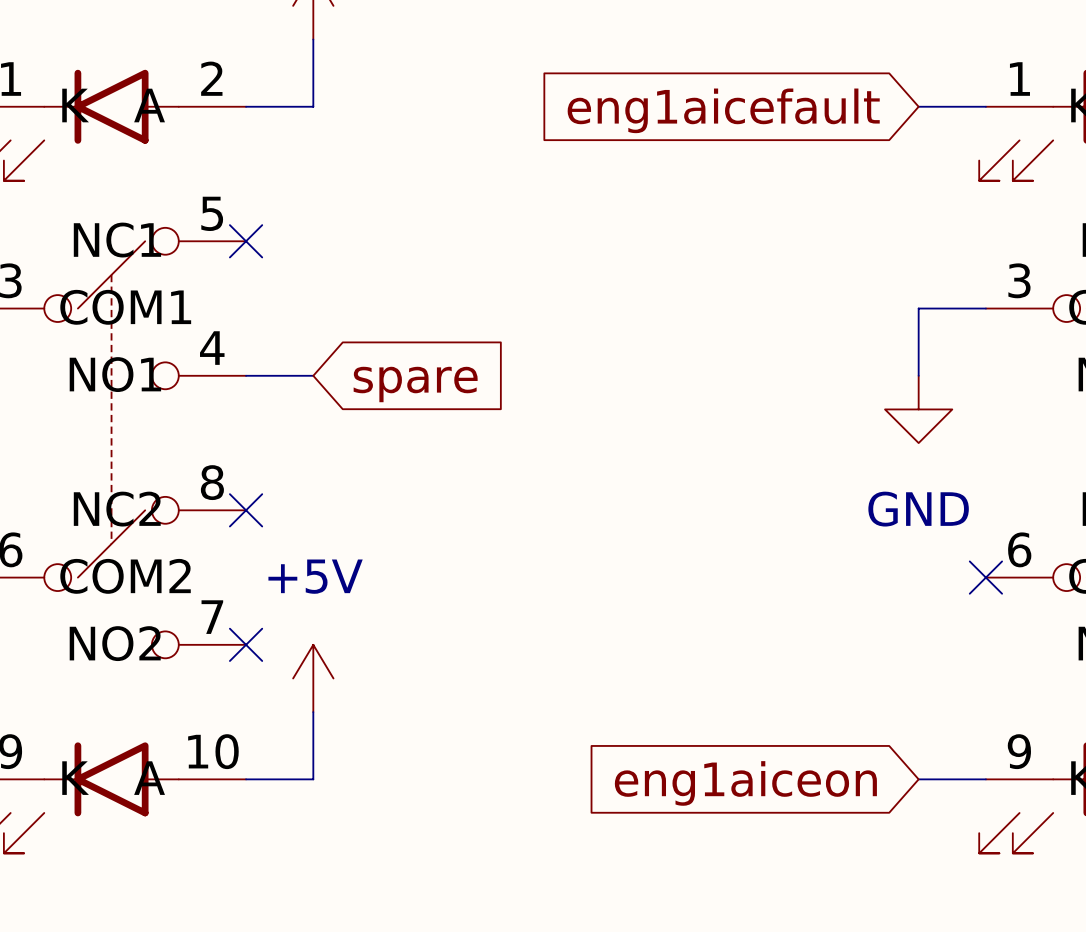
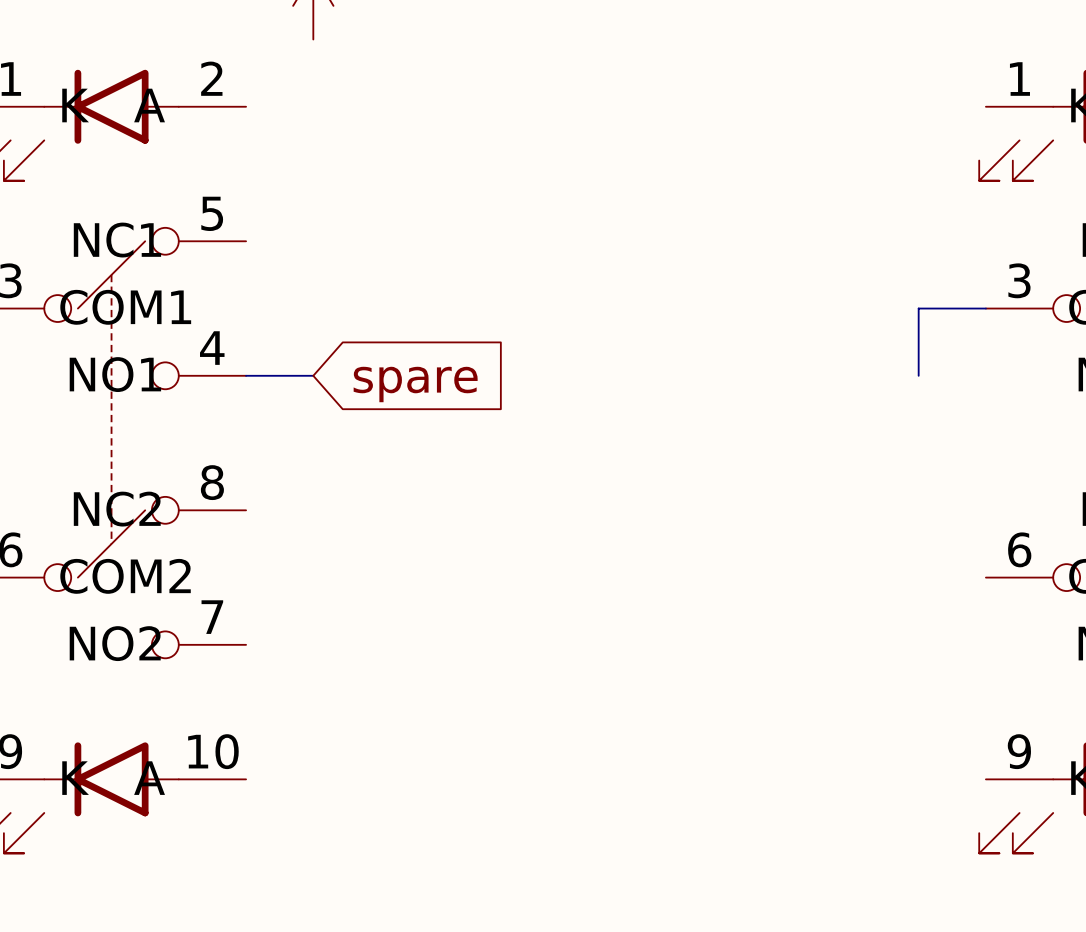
wire: (313, 39) (313, 106) (246, 106) -> none
wire: (918, 106) (985, 106) -> none
global label: eng1aicefault (723, 110) -> none
no-connect mark: (246, 241) -> none
power symbol: GND (918, 409) -> none
no-connect mark: (246, 510) -> none
no-connect mark: (985, 577) -> none
no-connect mark: (246, 644) -> none
power symbol: +5V (313, 678) -> none
wire: (313, 712) (313, 779) (246, 779) -> none
wire: (918, 779) (985, 779) -> none
global label: eng1aiceon (745, 783) -> none

